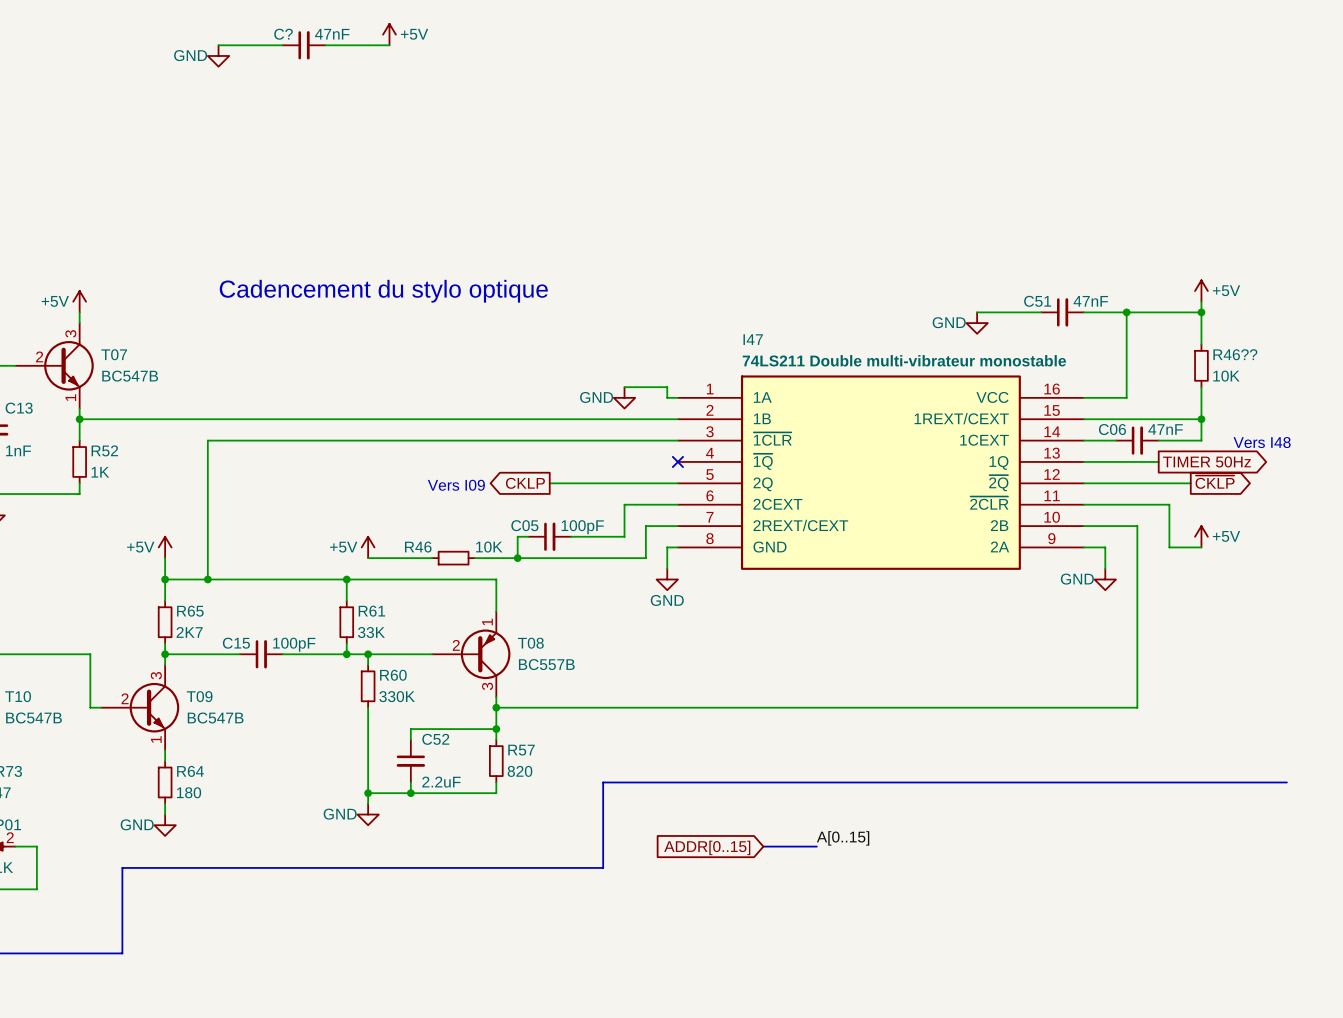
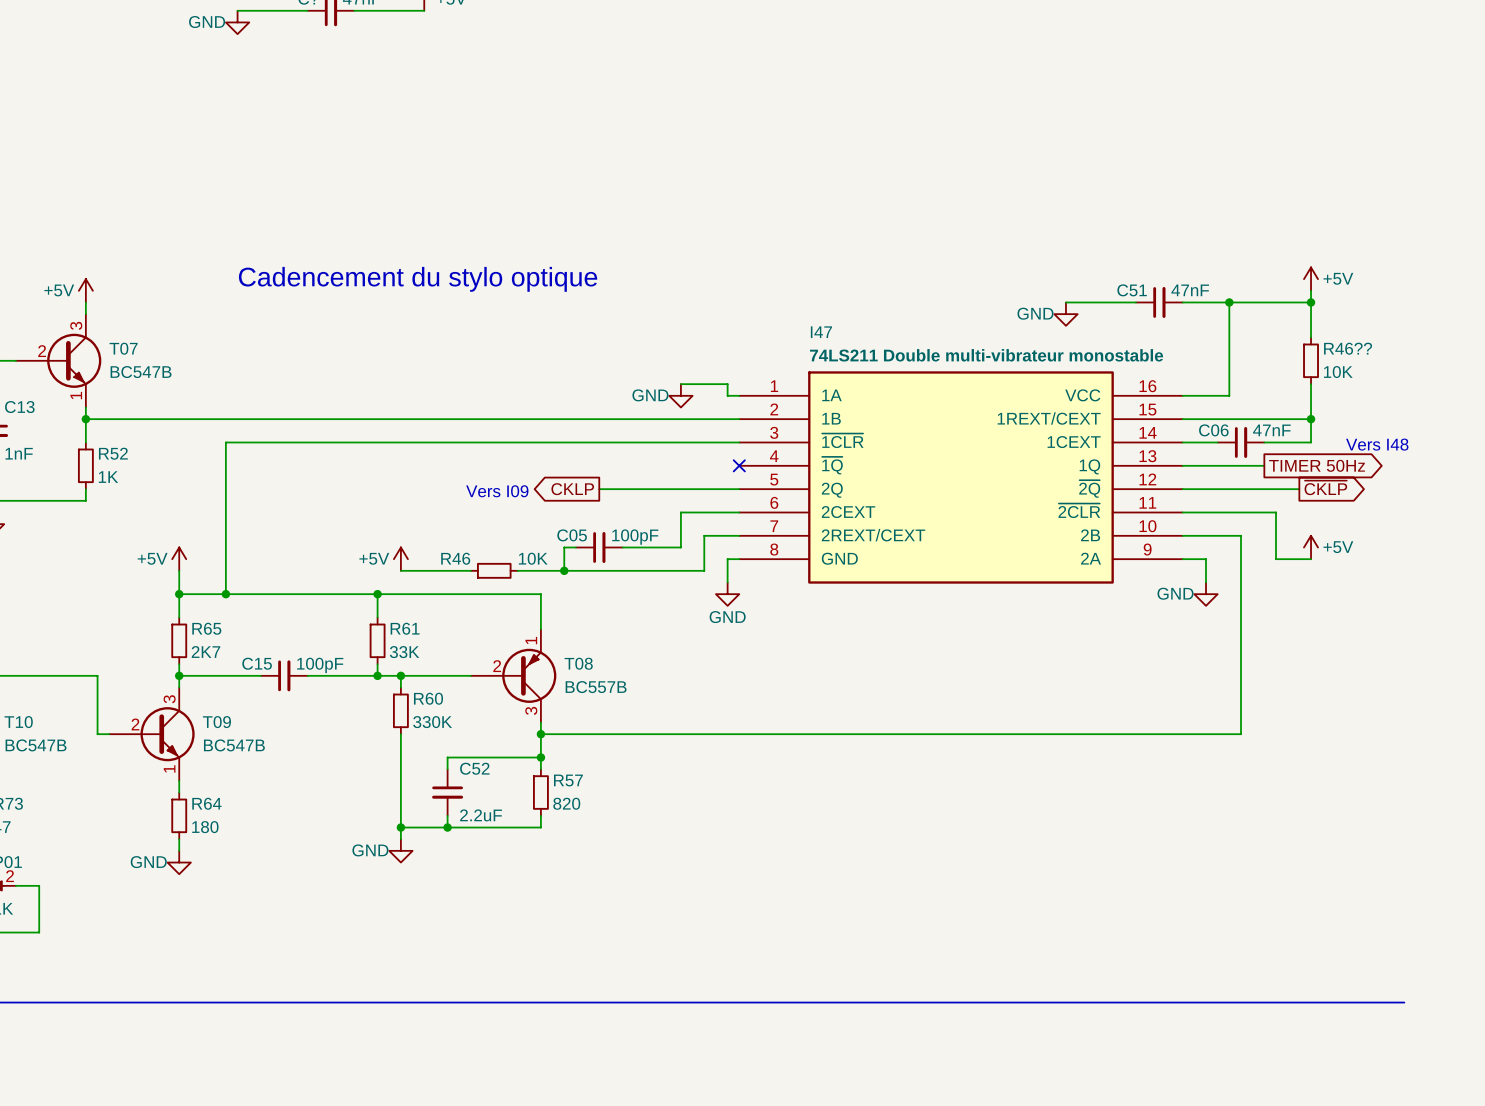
line: (1286, 782) (603, 782) (603, 867) (122, 867) (122, 953) -> (1404, 1002) (132, 1002)
label: A[0..15] (843, 838) -> none
bus: (763, 846) (816, 846) -> none
global label: ADDR[0..15] (707, 847) -> none

